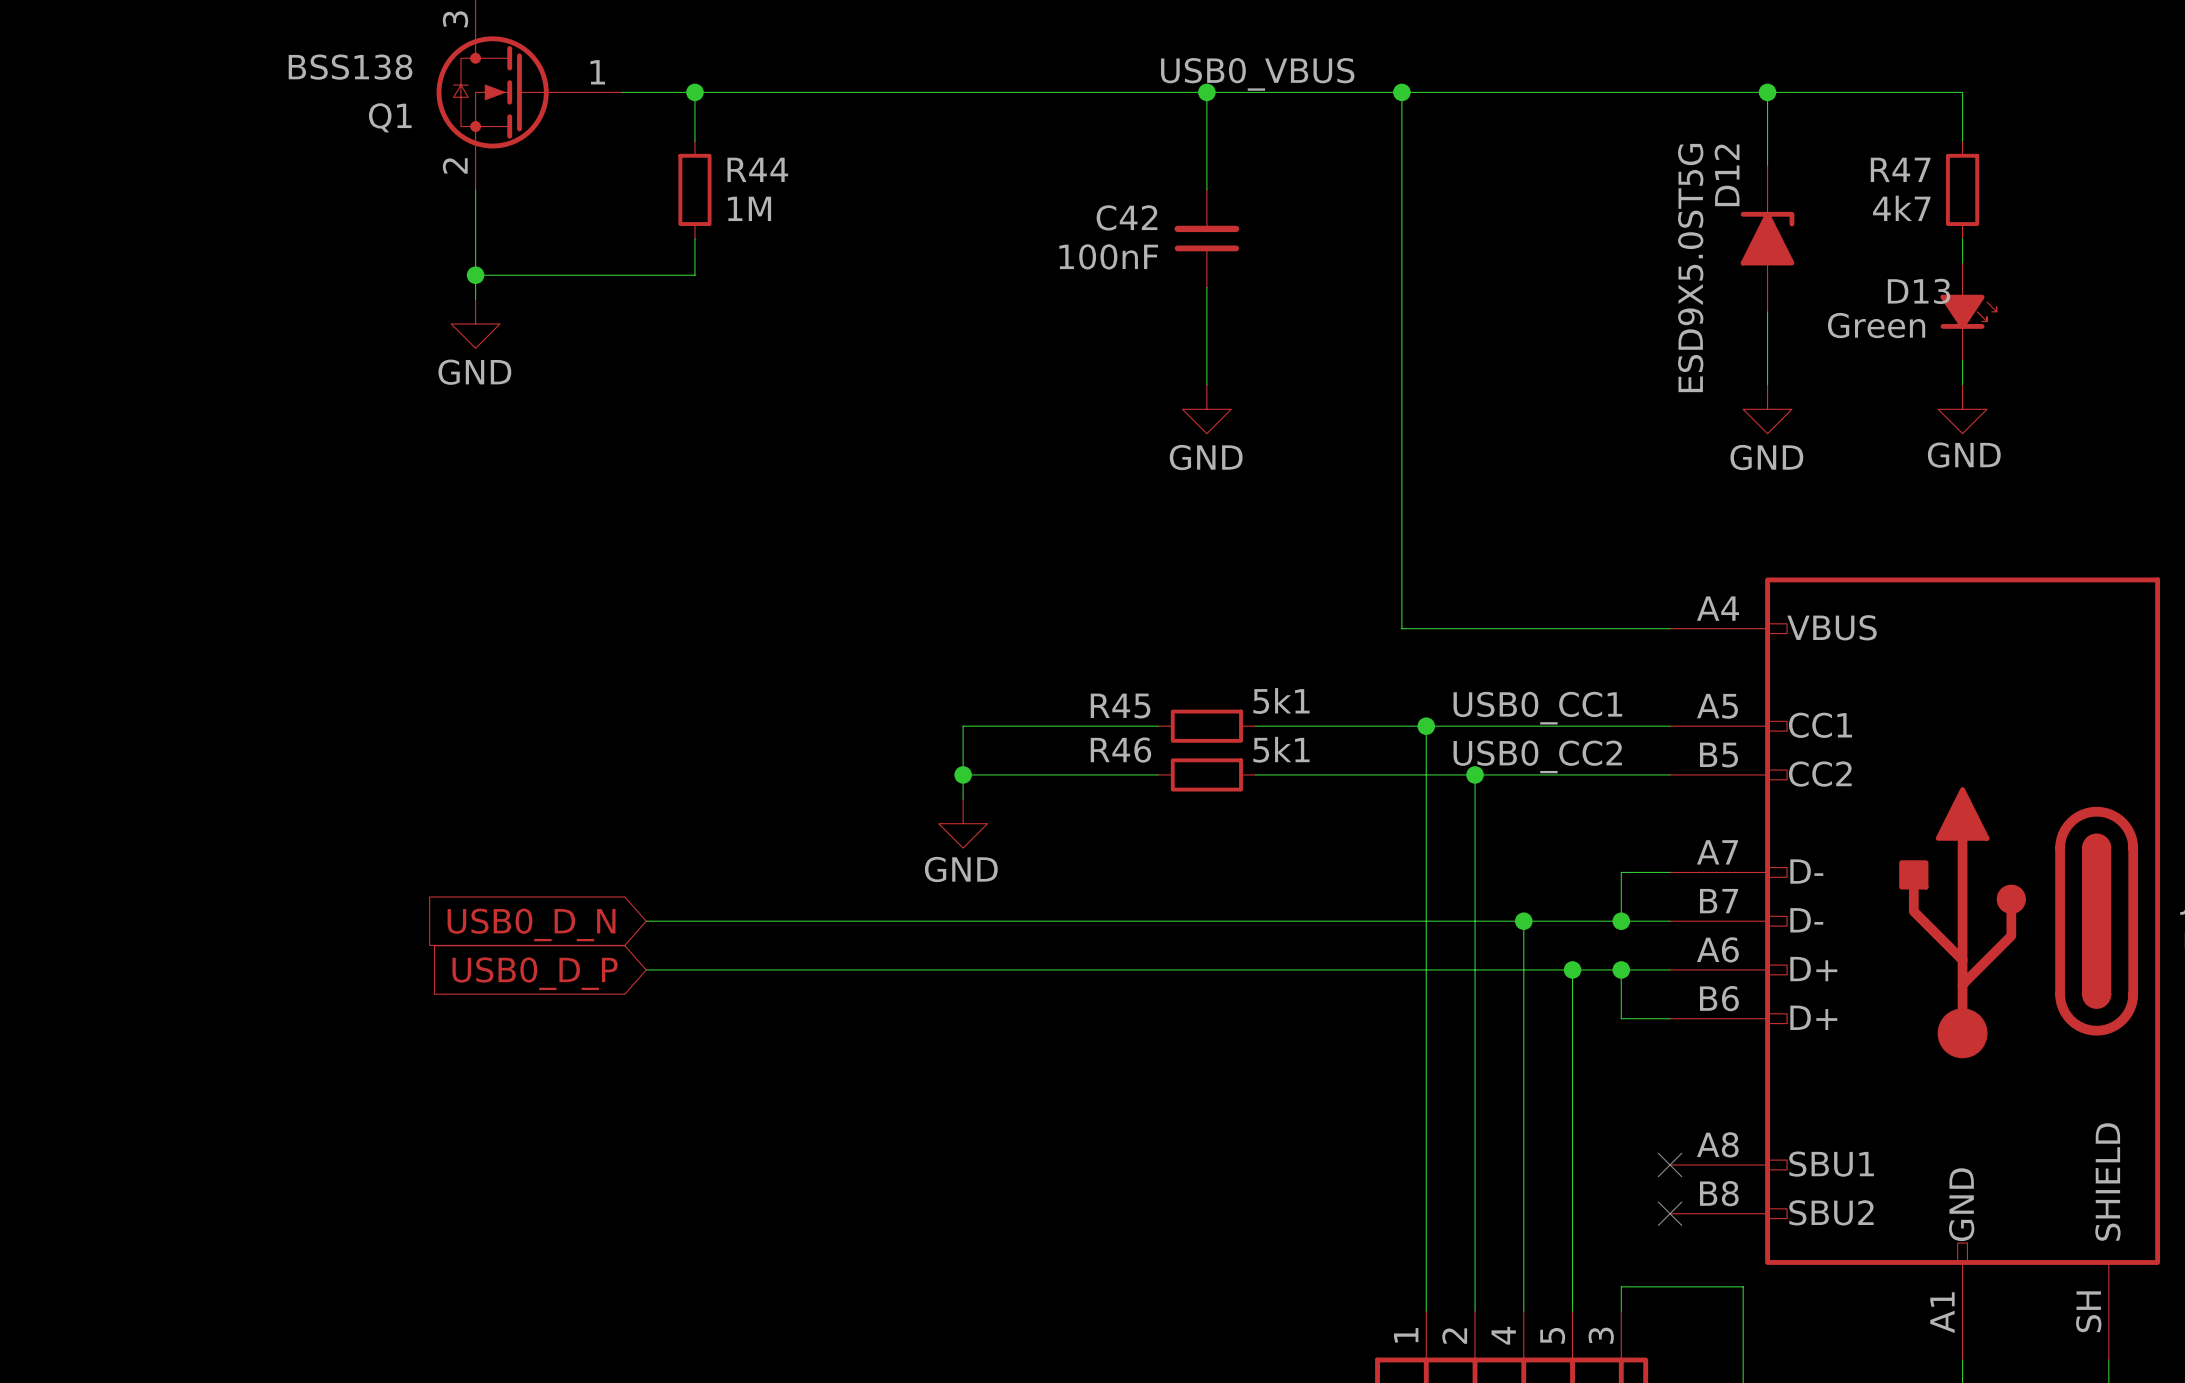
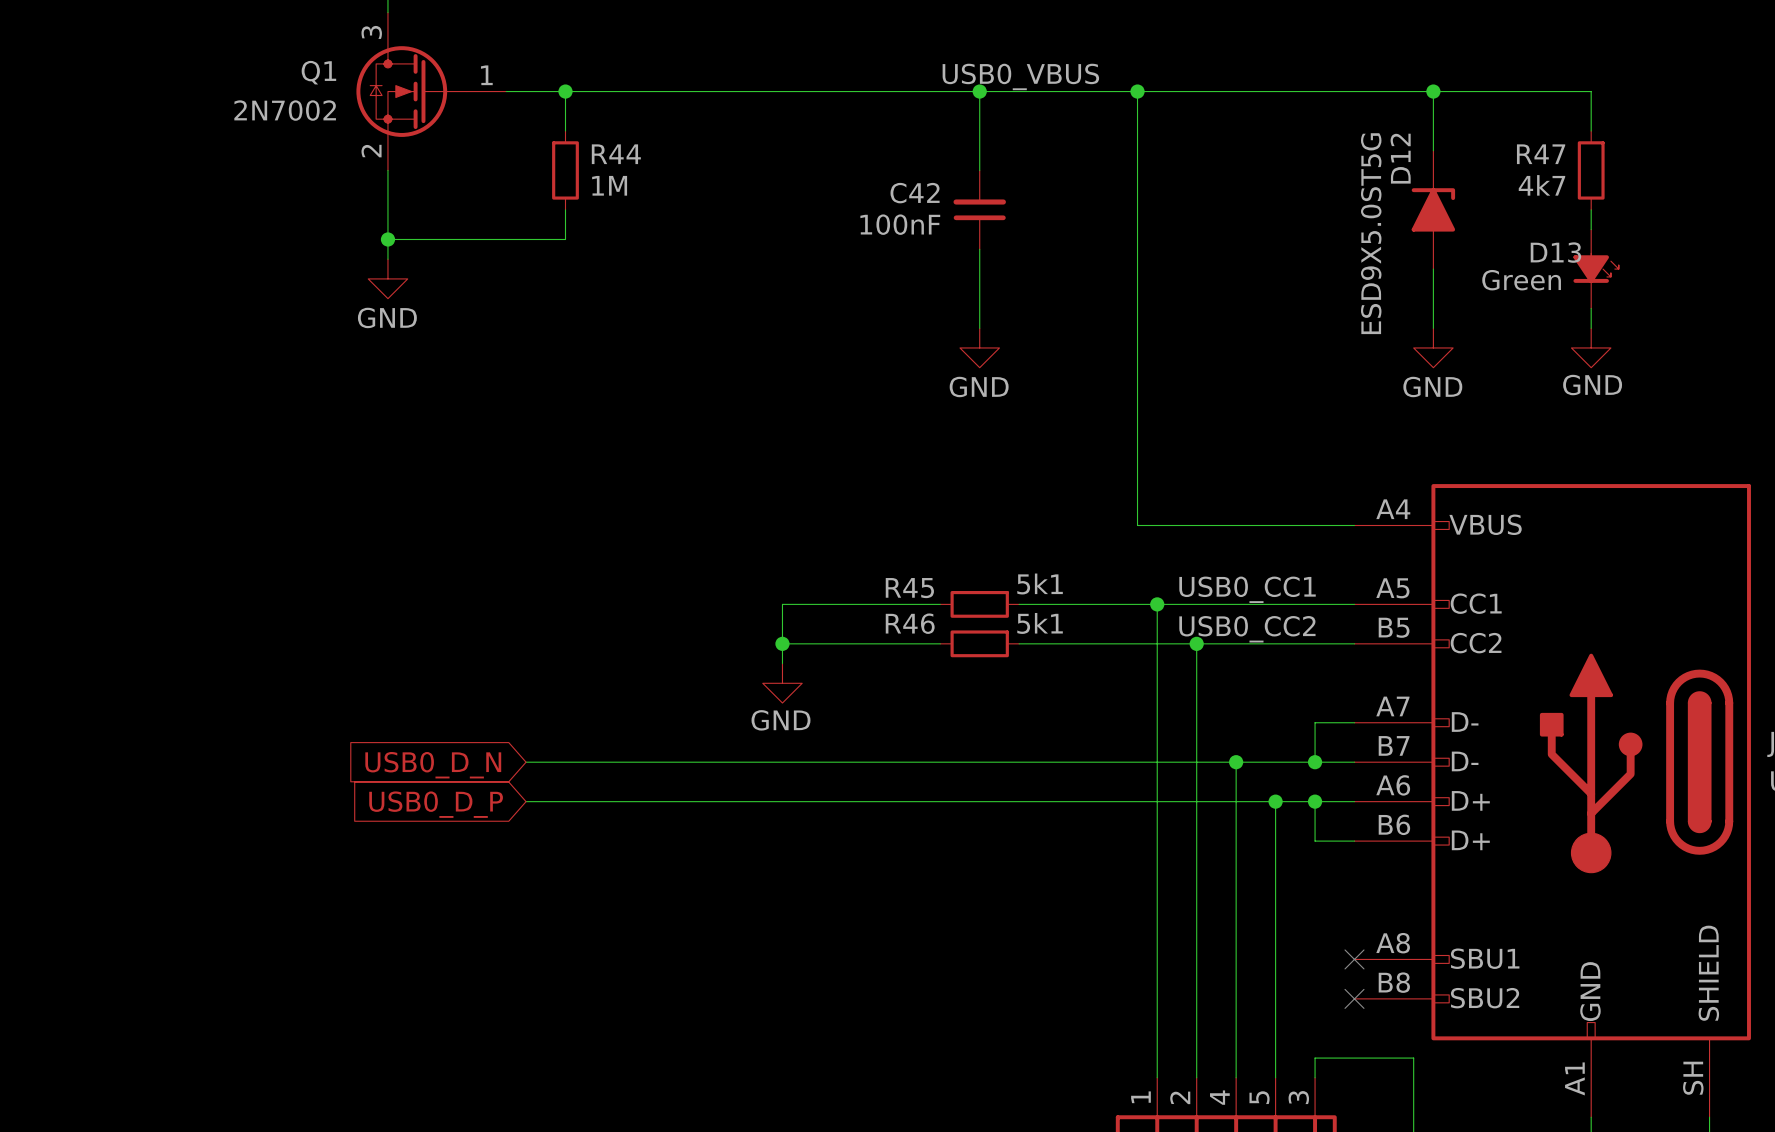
Q1 value: BSS138 (350, 67) -> 2N7002 (285, 110)
Q1 name position: Q1 (390, 117) -> Q1 (318, 72)

